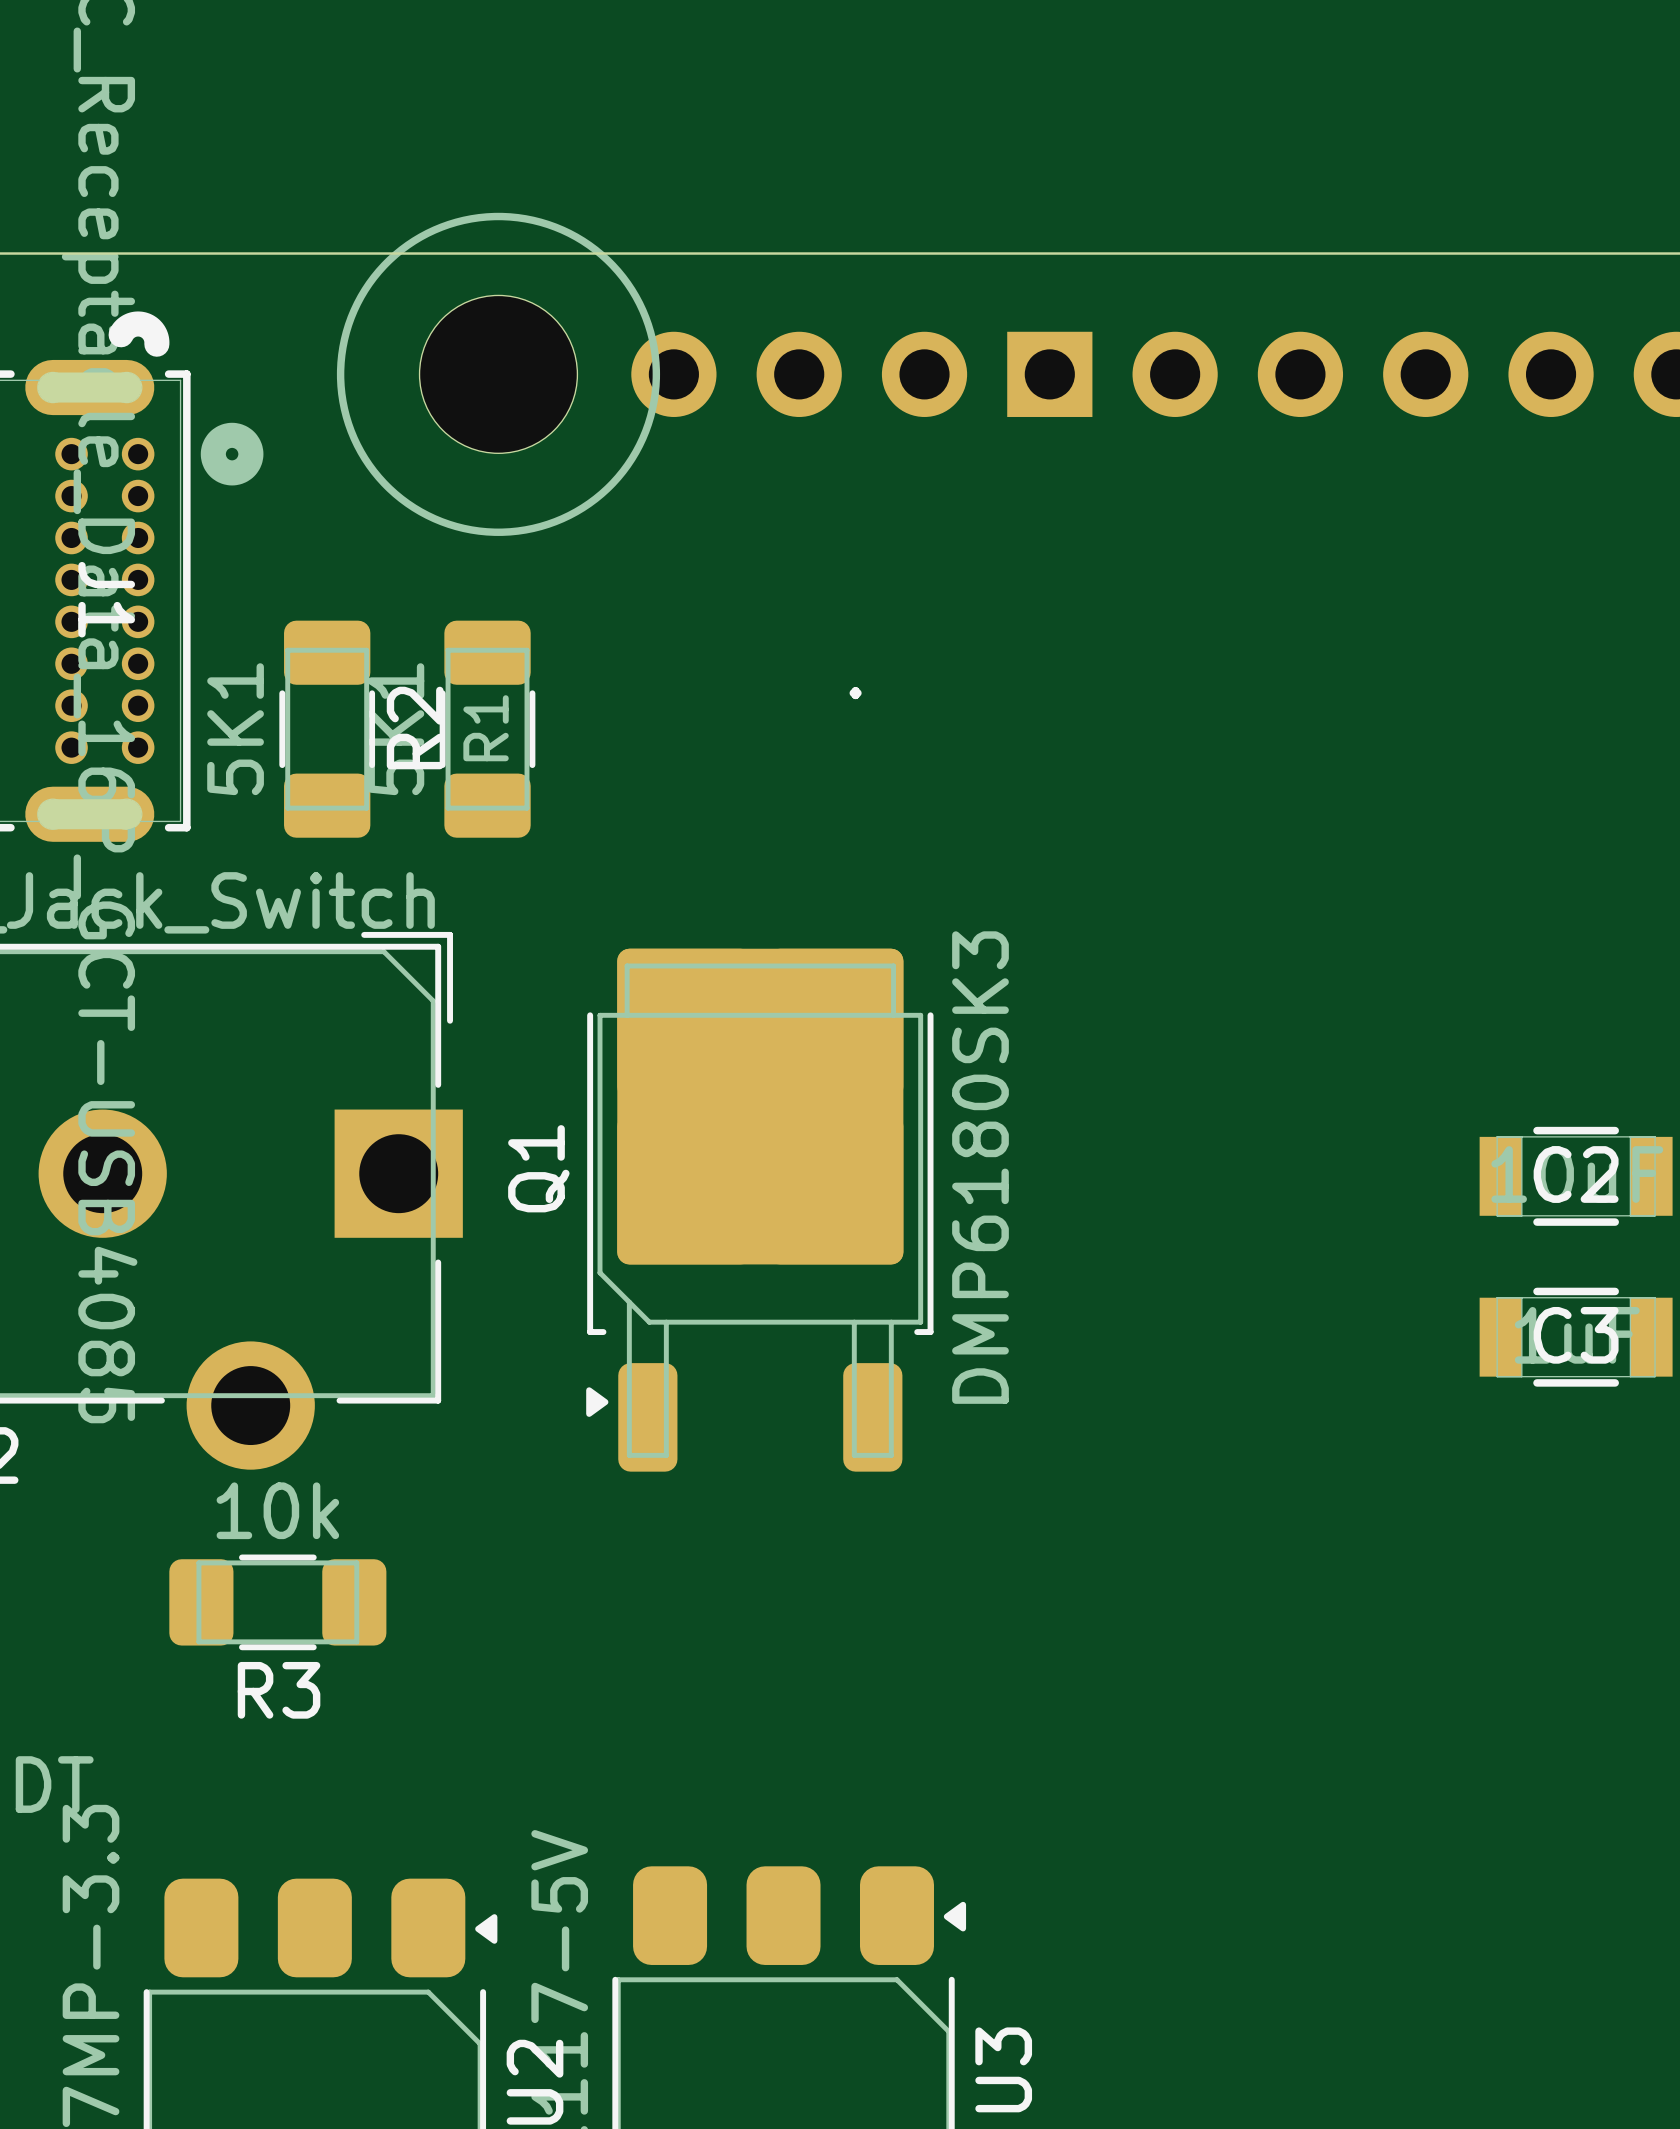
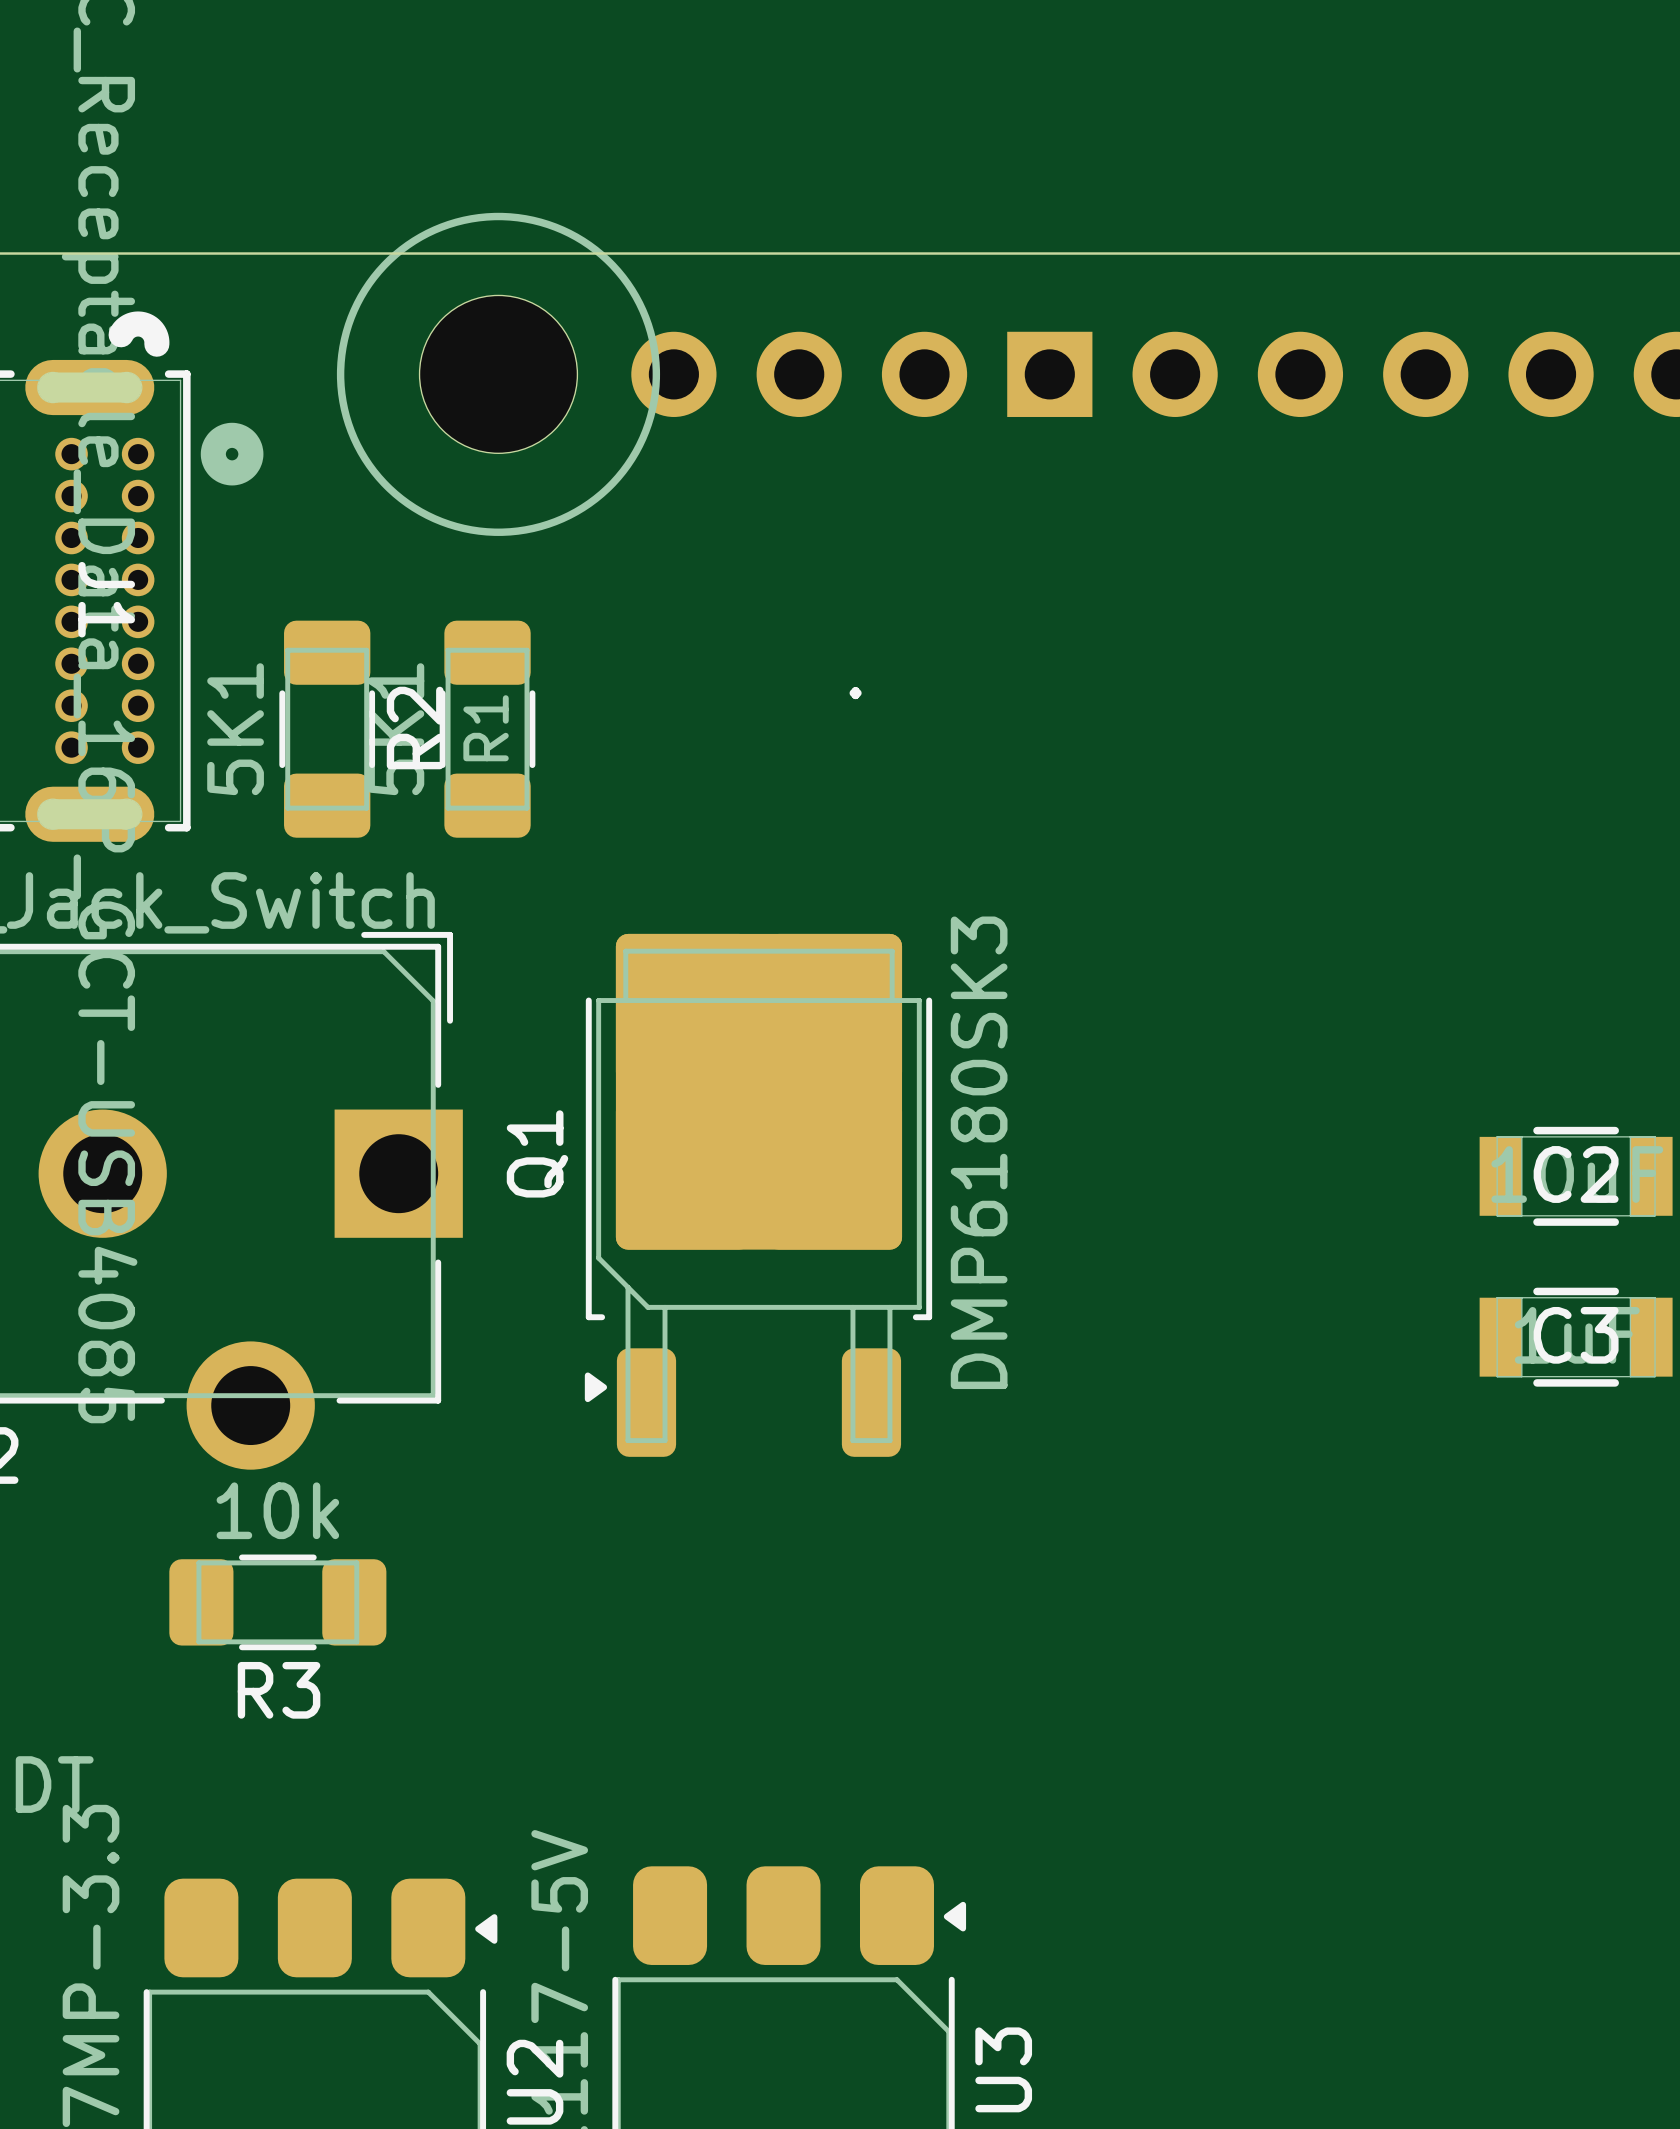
Q1 position: (759, 1210) -> (758, 1195)

